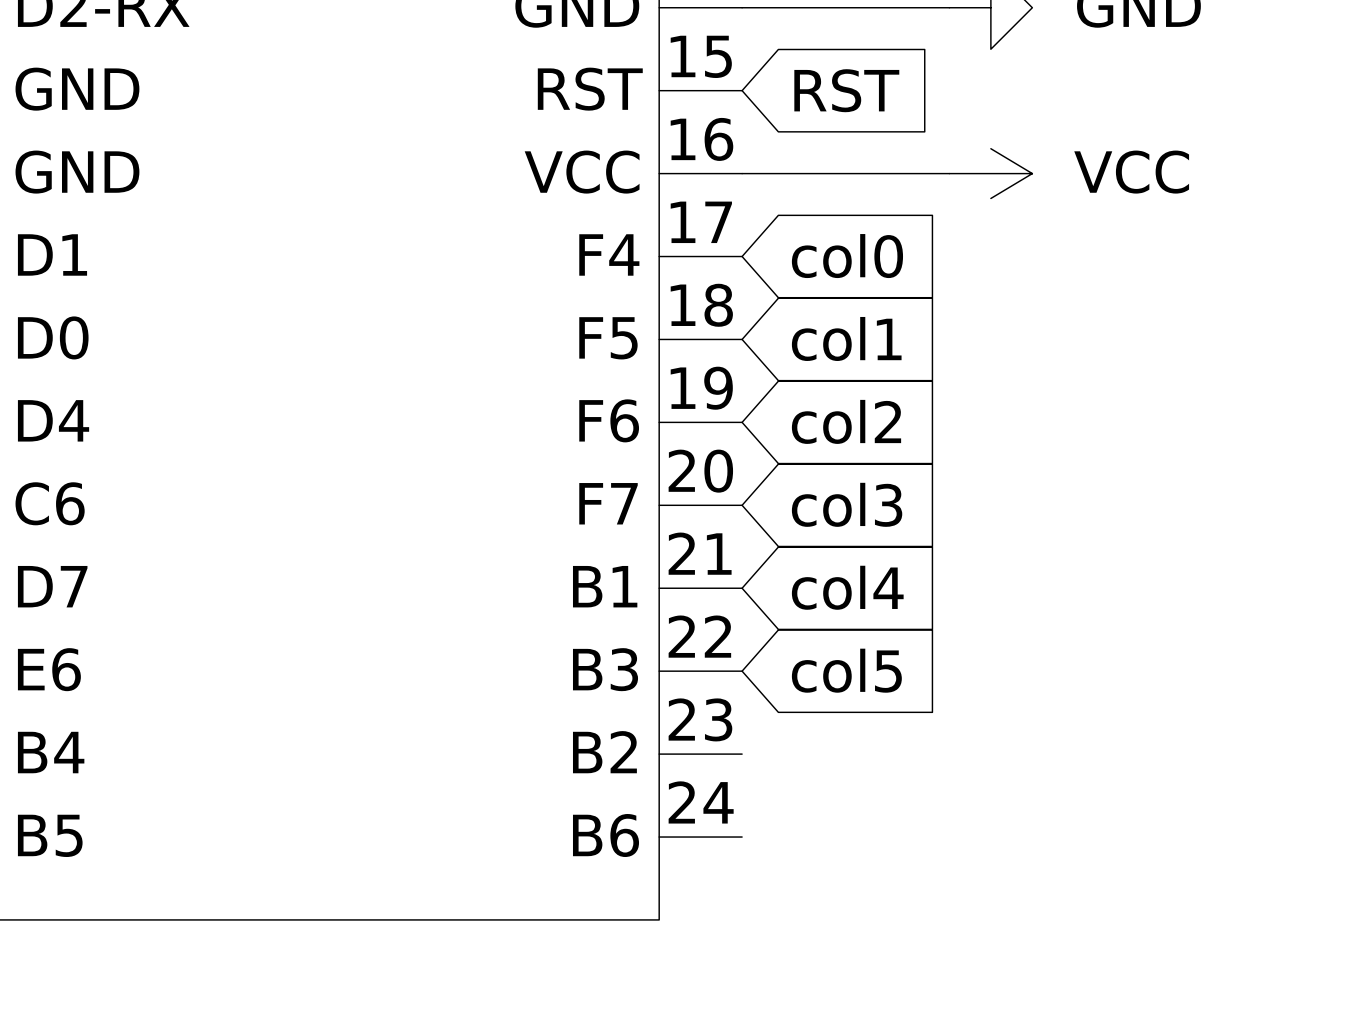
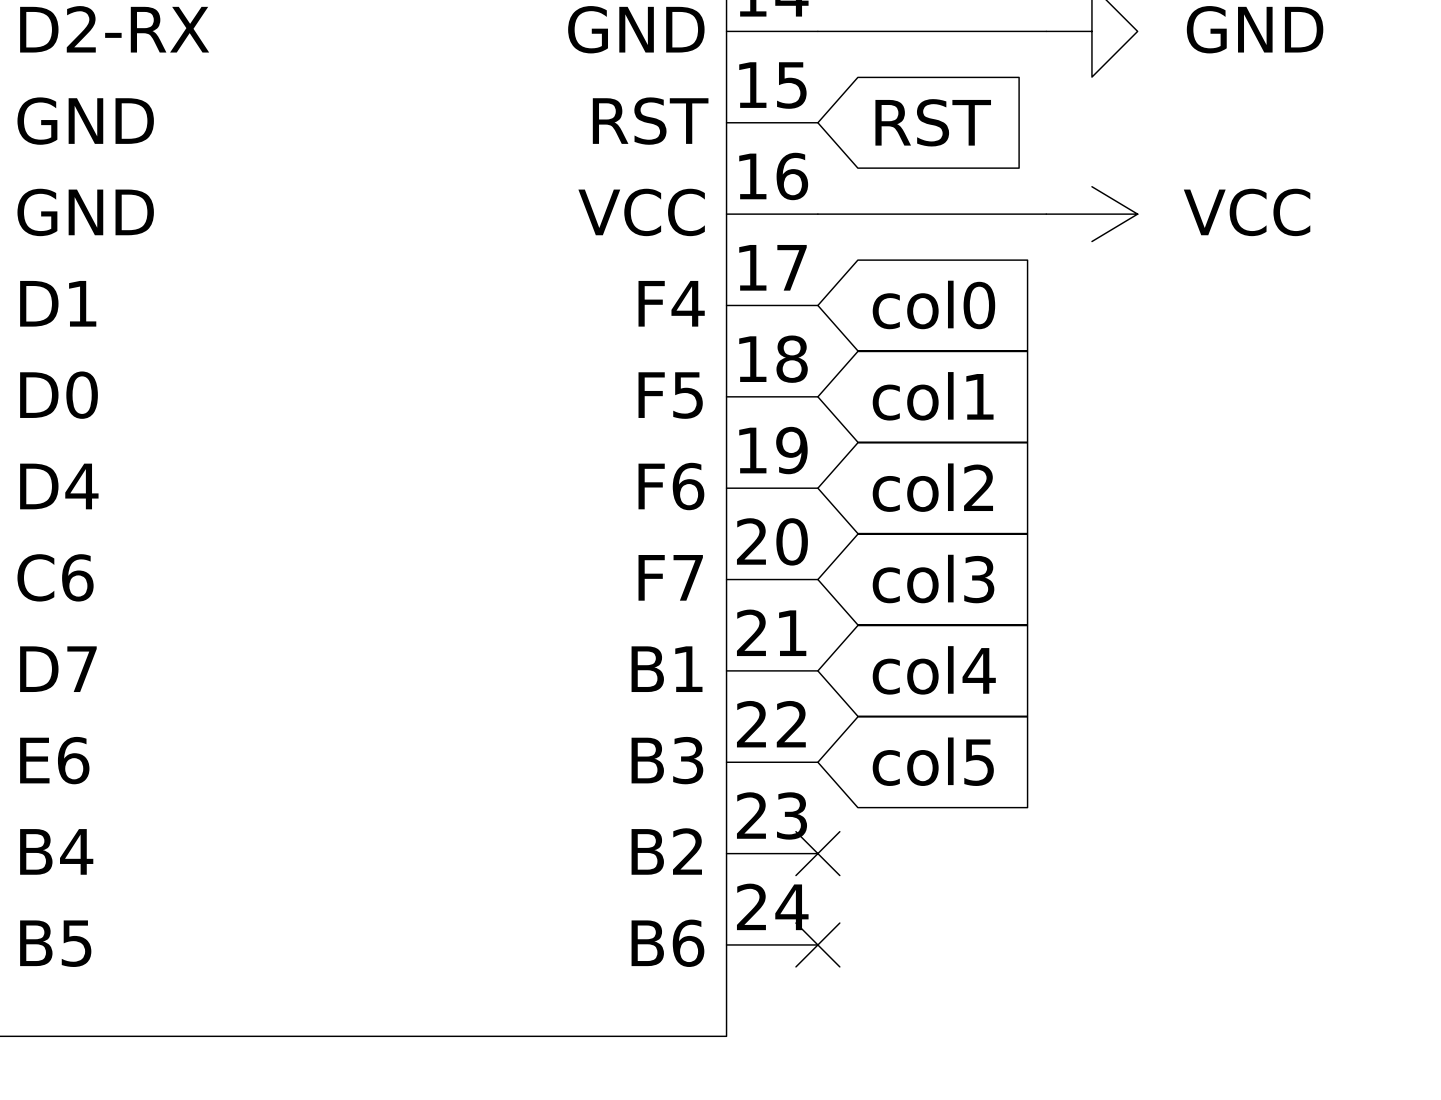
no-connect mark: none -> (817, 853)
no-connect mark: none -> (817, 944)

